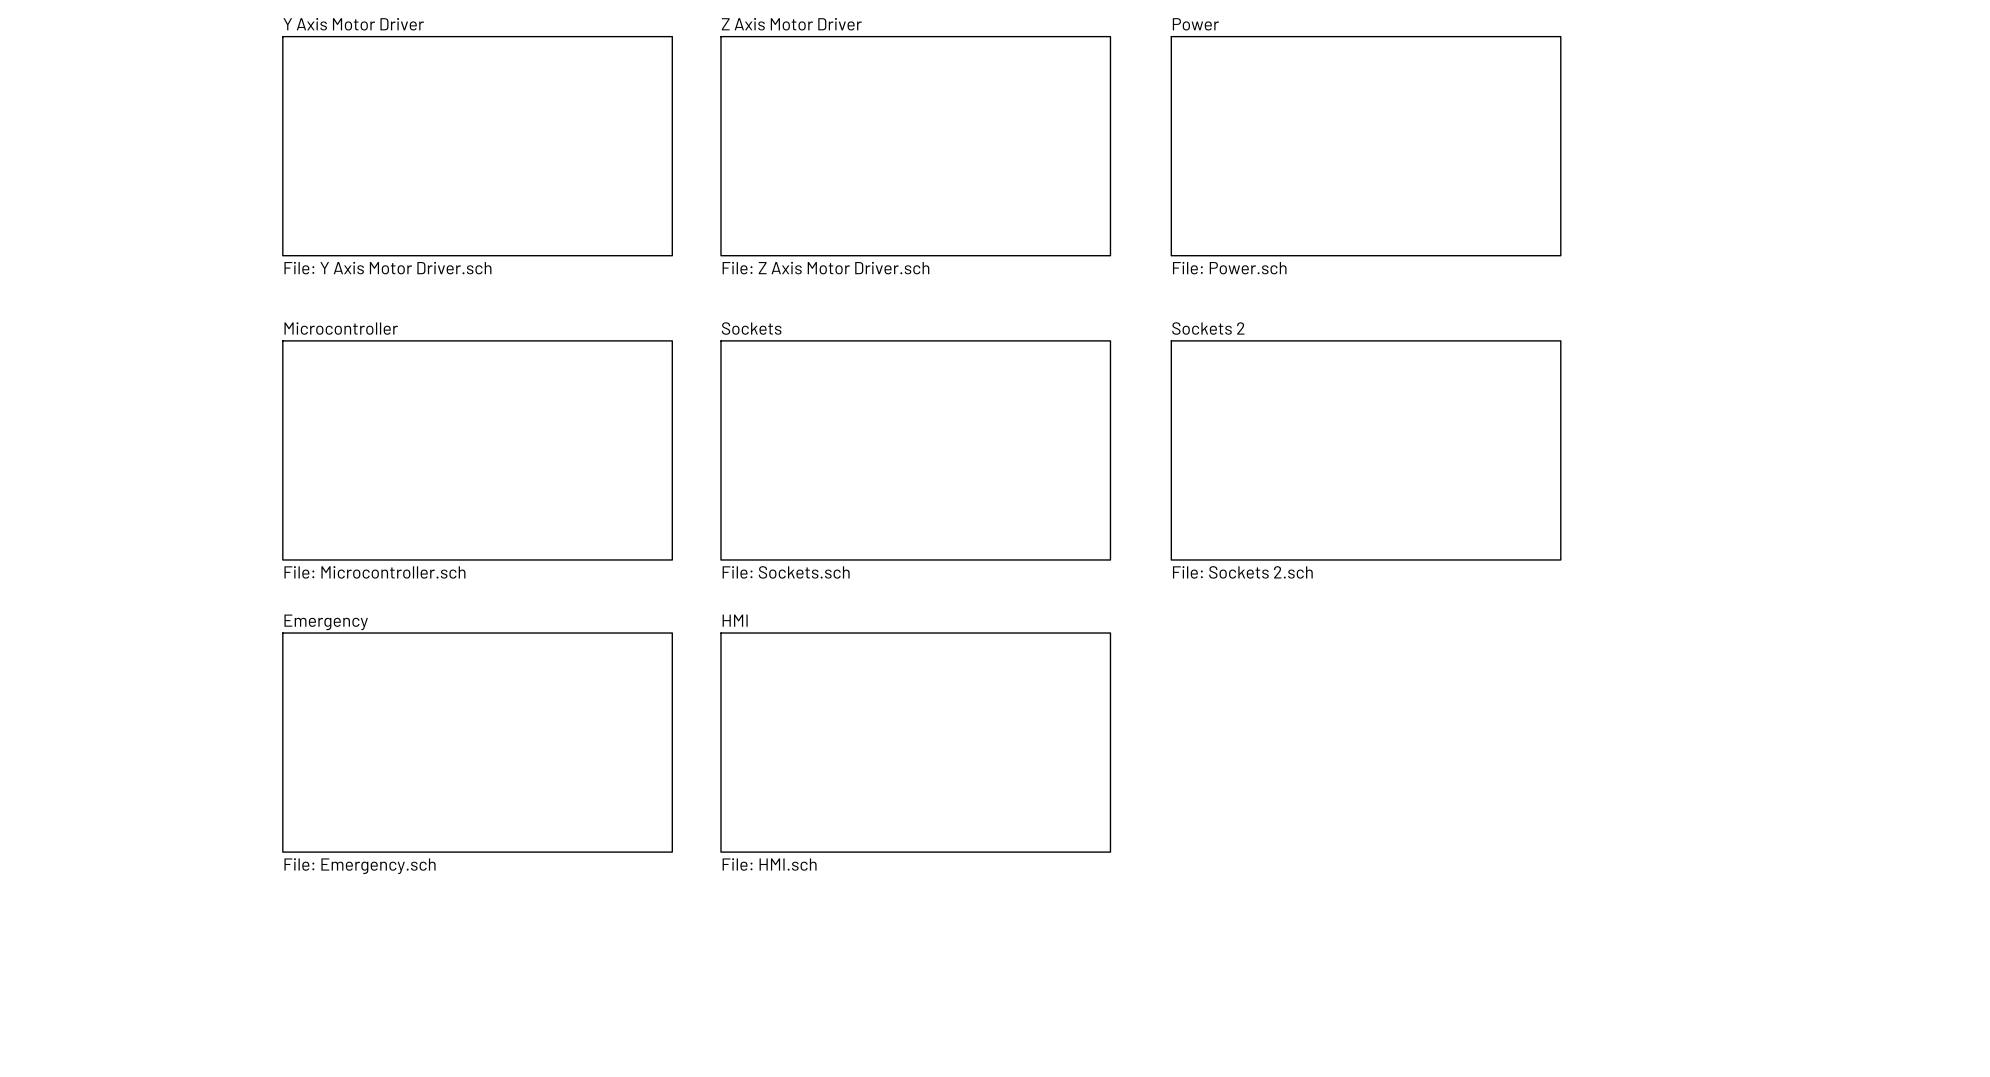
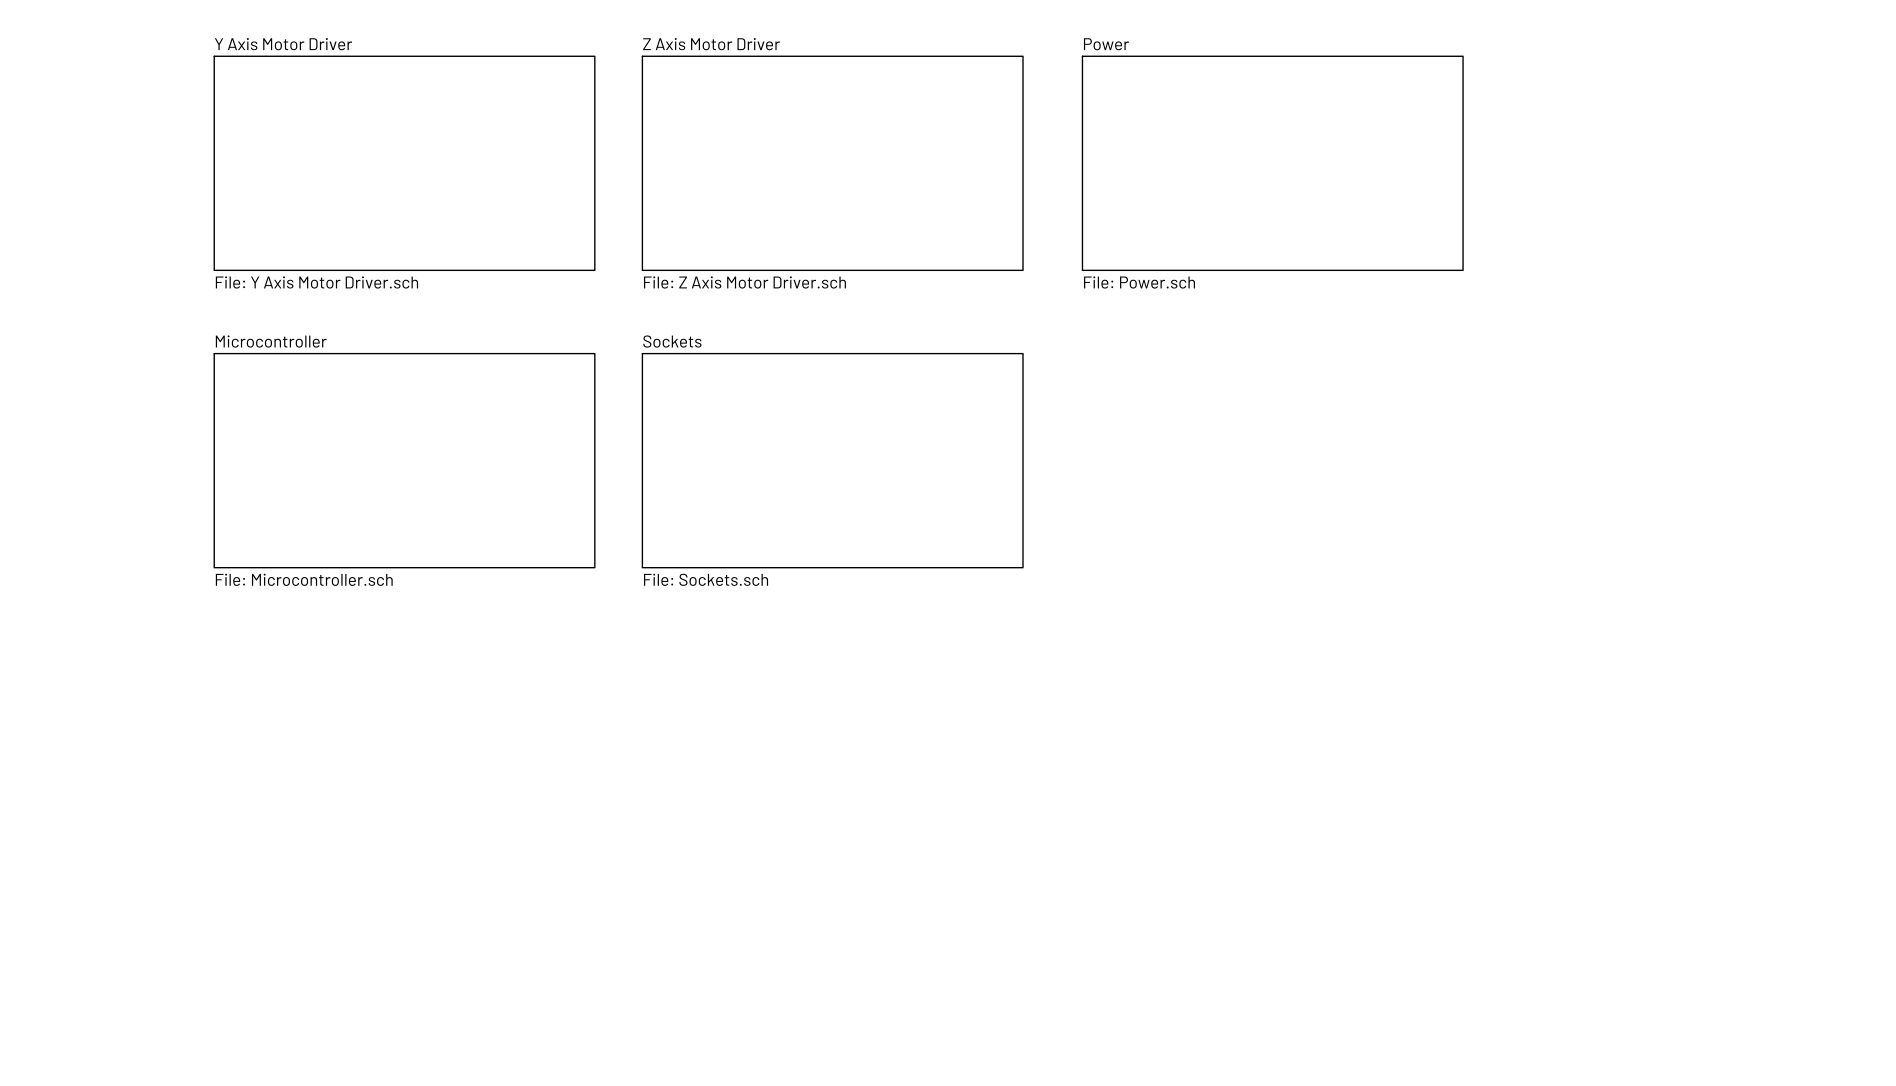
sheet Sockets 2: File: Sockets 2.sch (1366, 450) -> none
sheet Emergency: File: Emergency.sch (477, 742) -> none
sheet HMI: File: HMI.sch (915, 742) -> none

